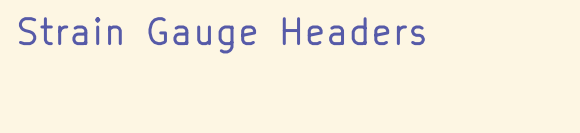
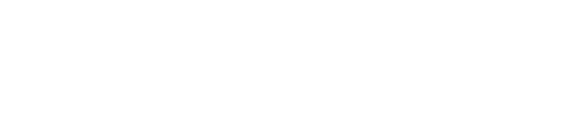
text: Strain Gauge Headers (221, 35) -> none

